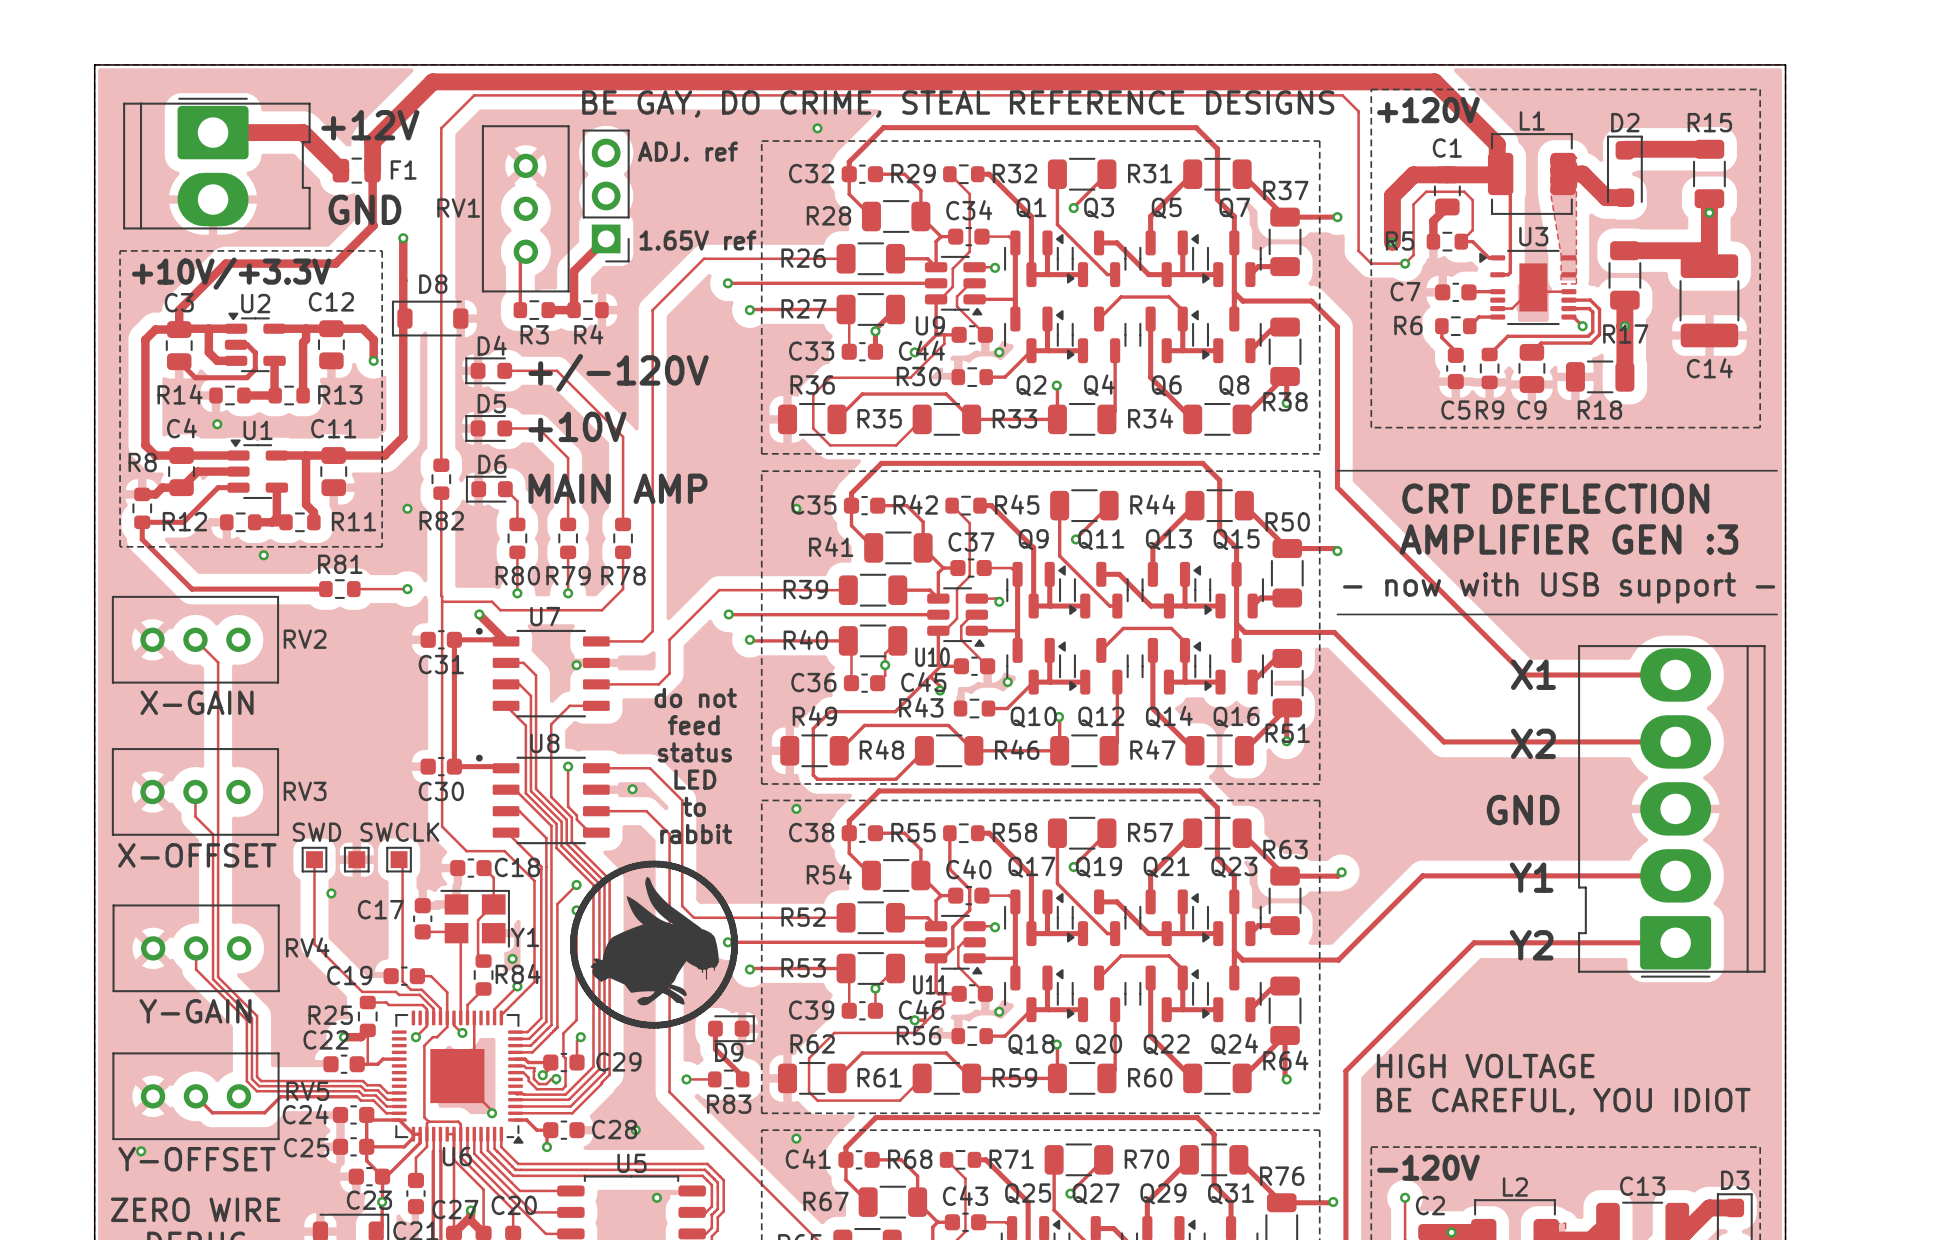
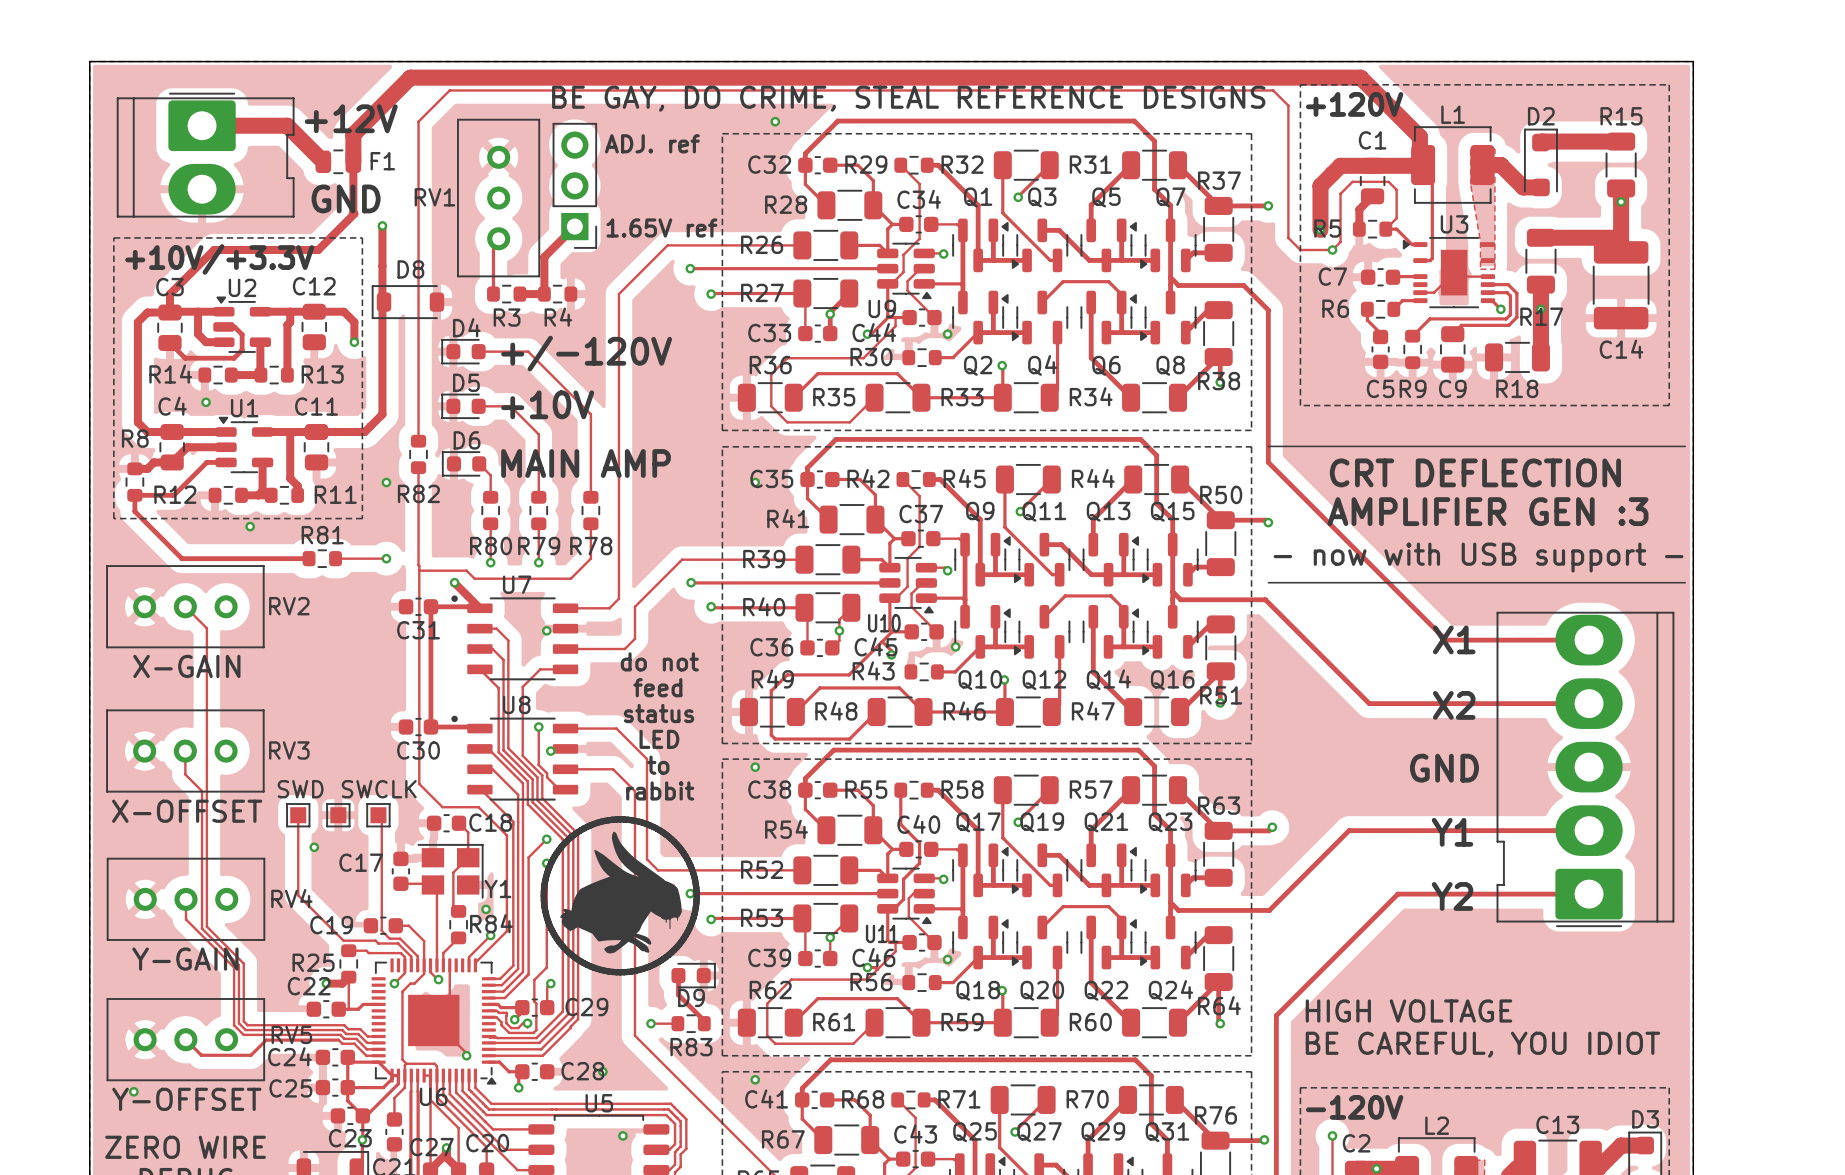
via position: (632, 789) -> (550, 751)

